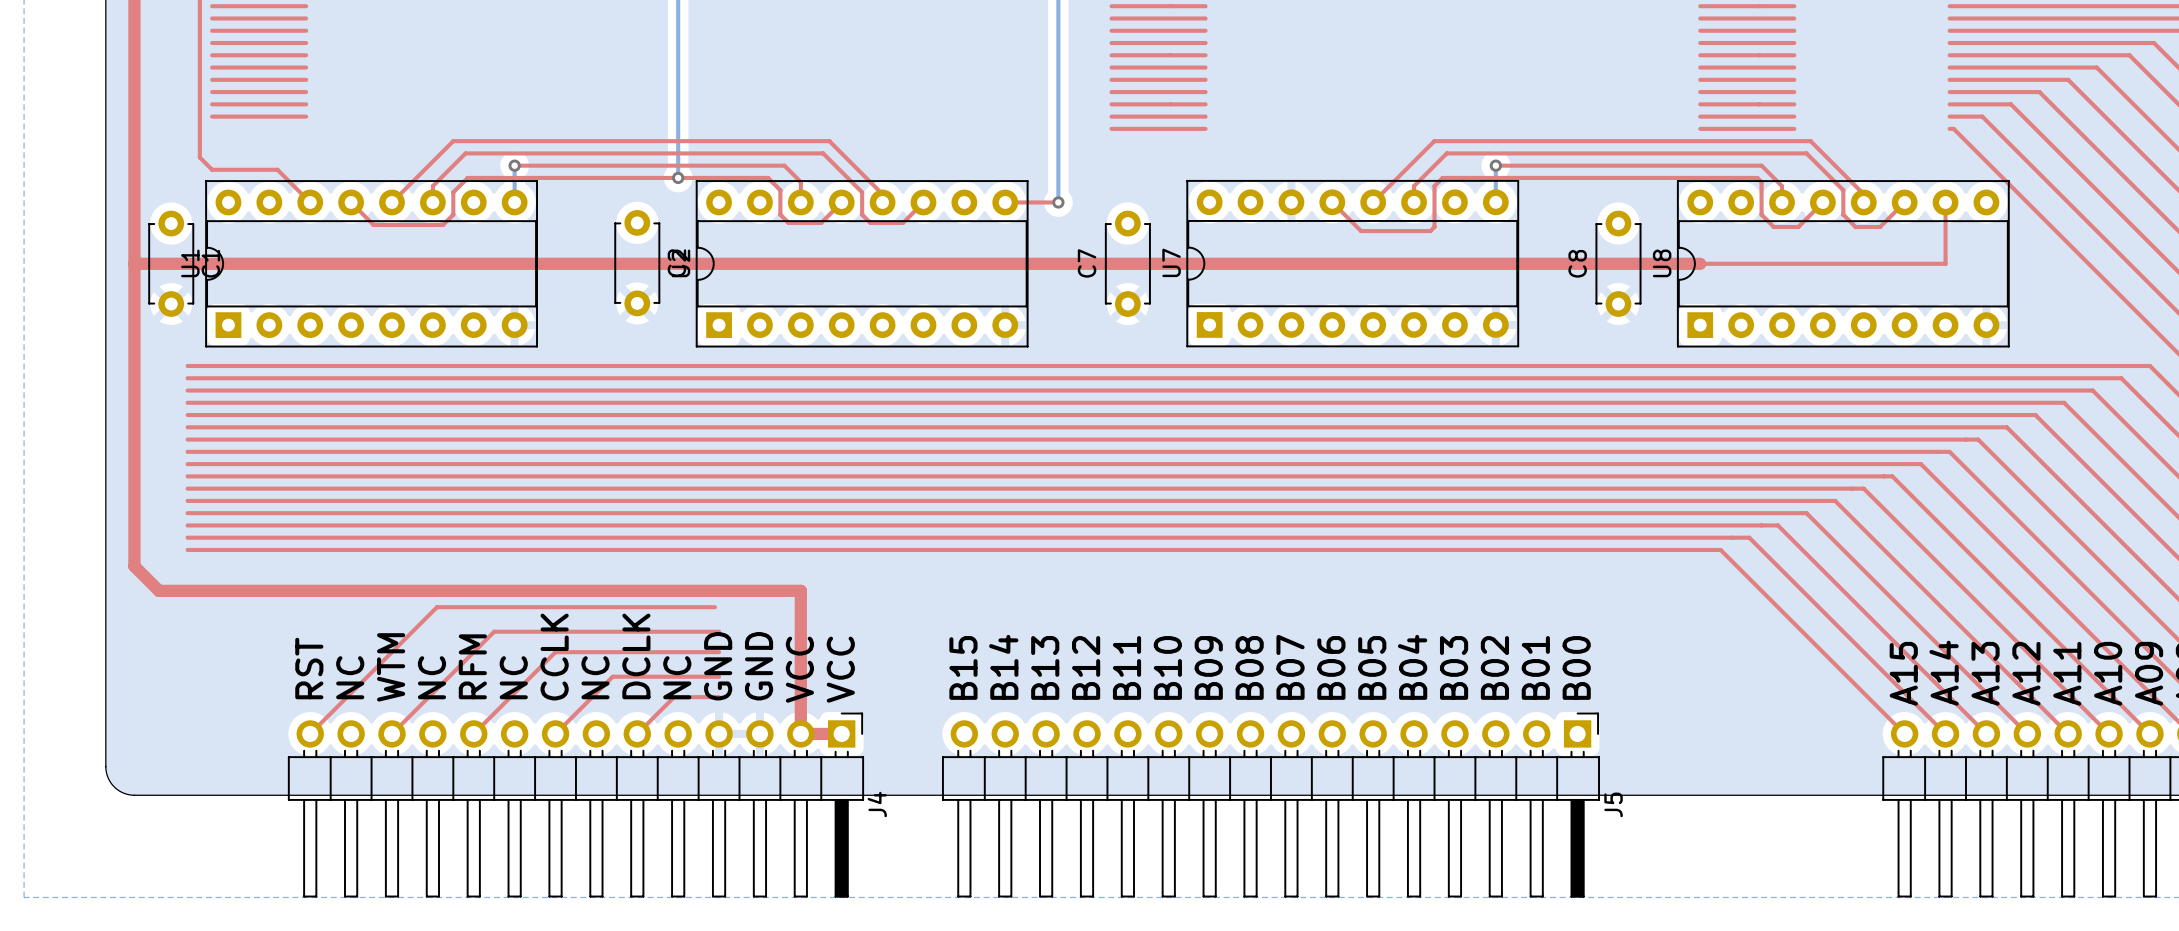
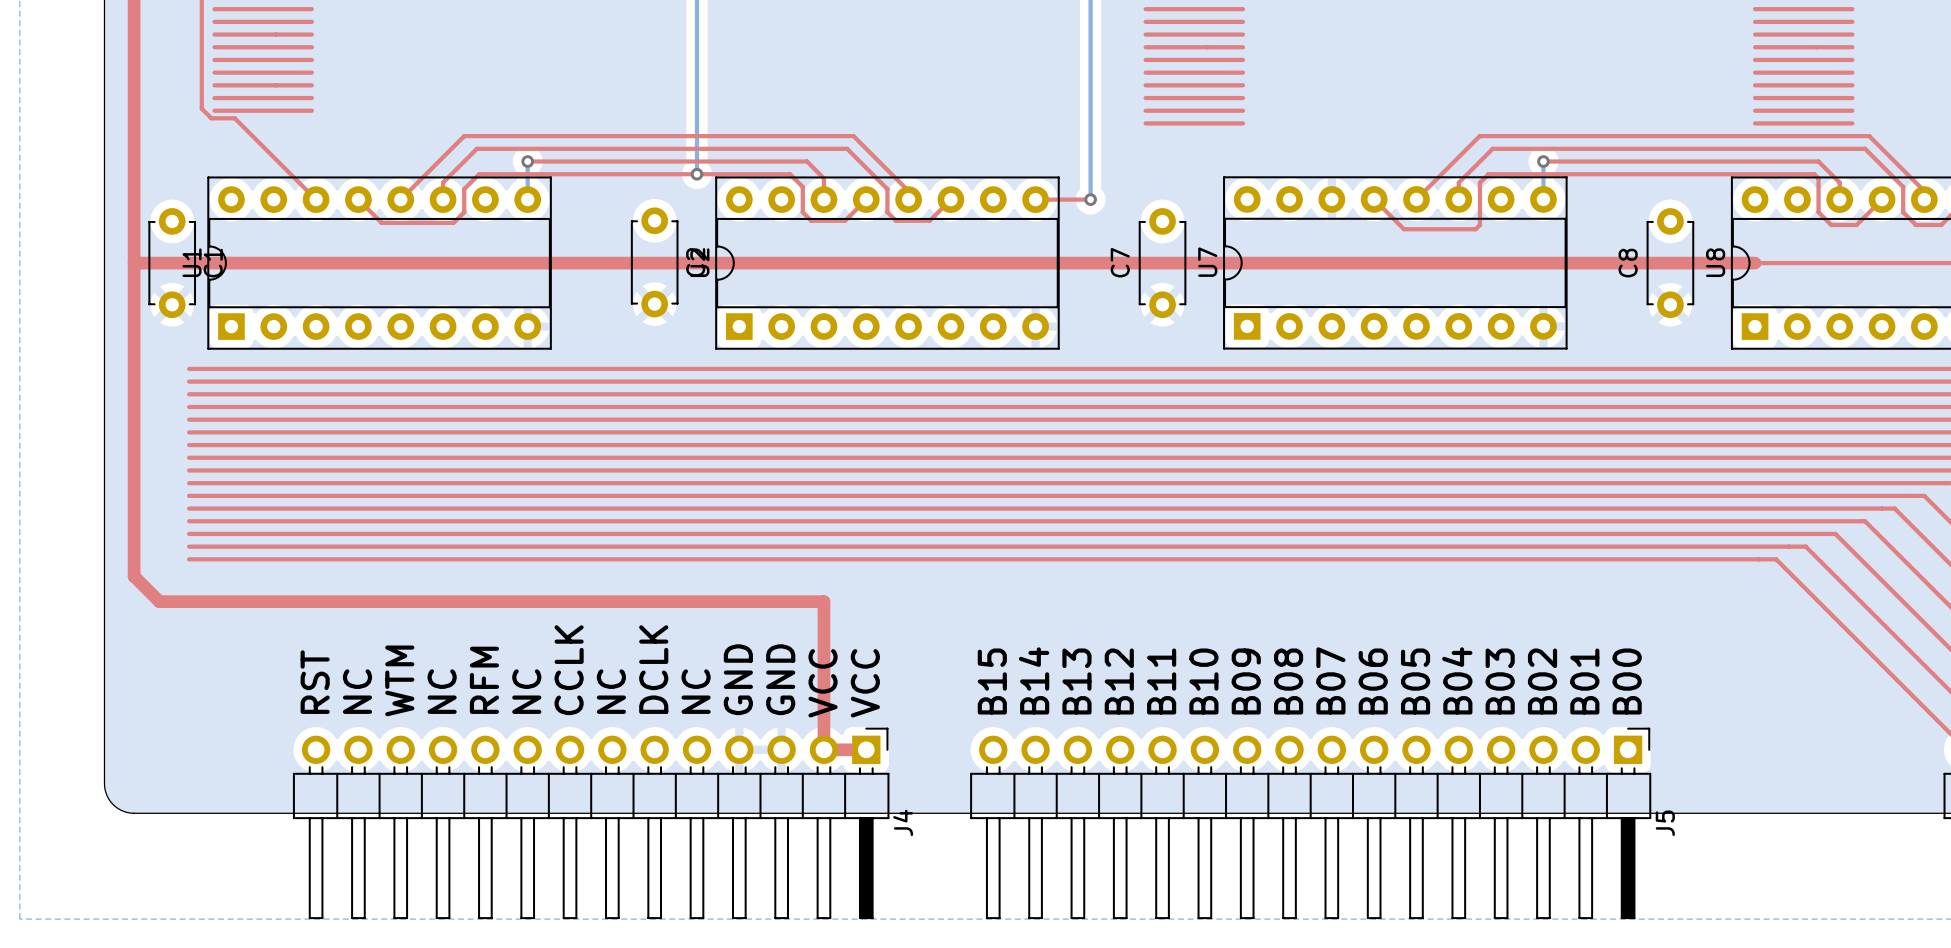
top track: (199, 114) (199, 157) (212, 169) (277, 169) -> (201, 108) (211, 118) (234, 118) (282, 165)
top track: (714, 607) (436, 607) (310, 733) -> none
top track: (719, 631) (494, 631) (392, 733) -> none
top track: (719, 652) (555, 652) (473, 733) -> none
top track: (719, 676) (612, 676) (555, 733) -> none
top track: (719, 697) (674, 697) (637, 733) -> none

